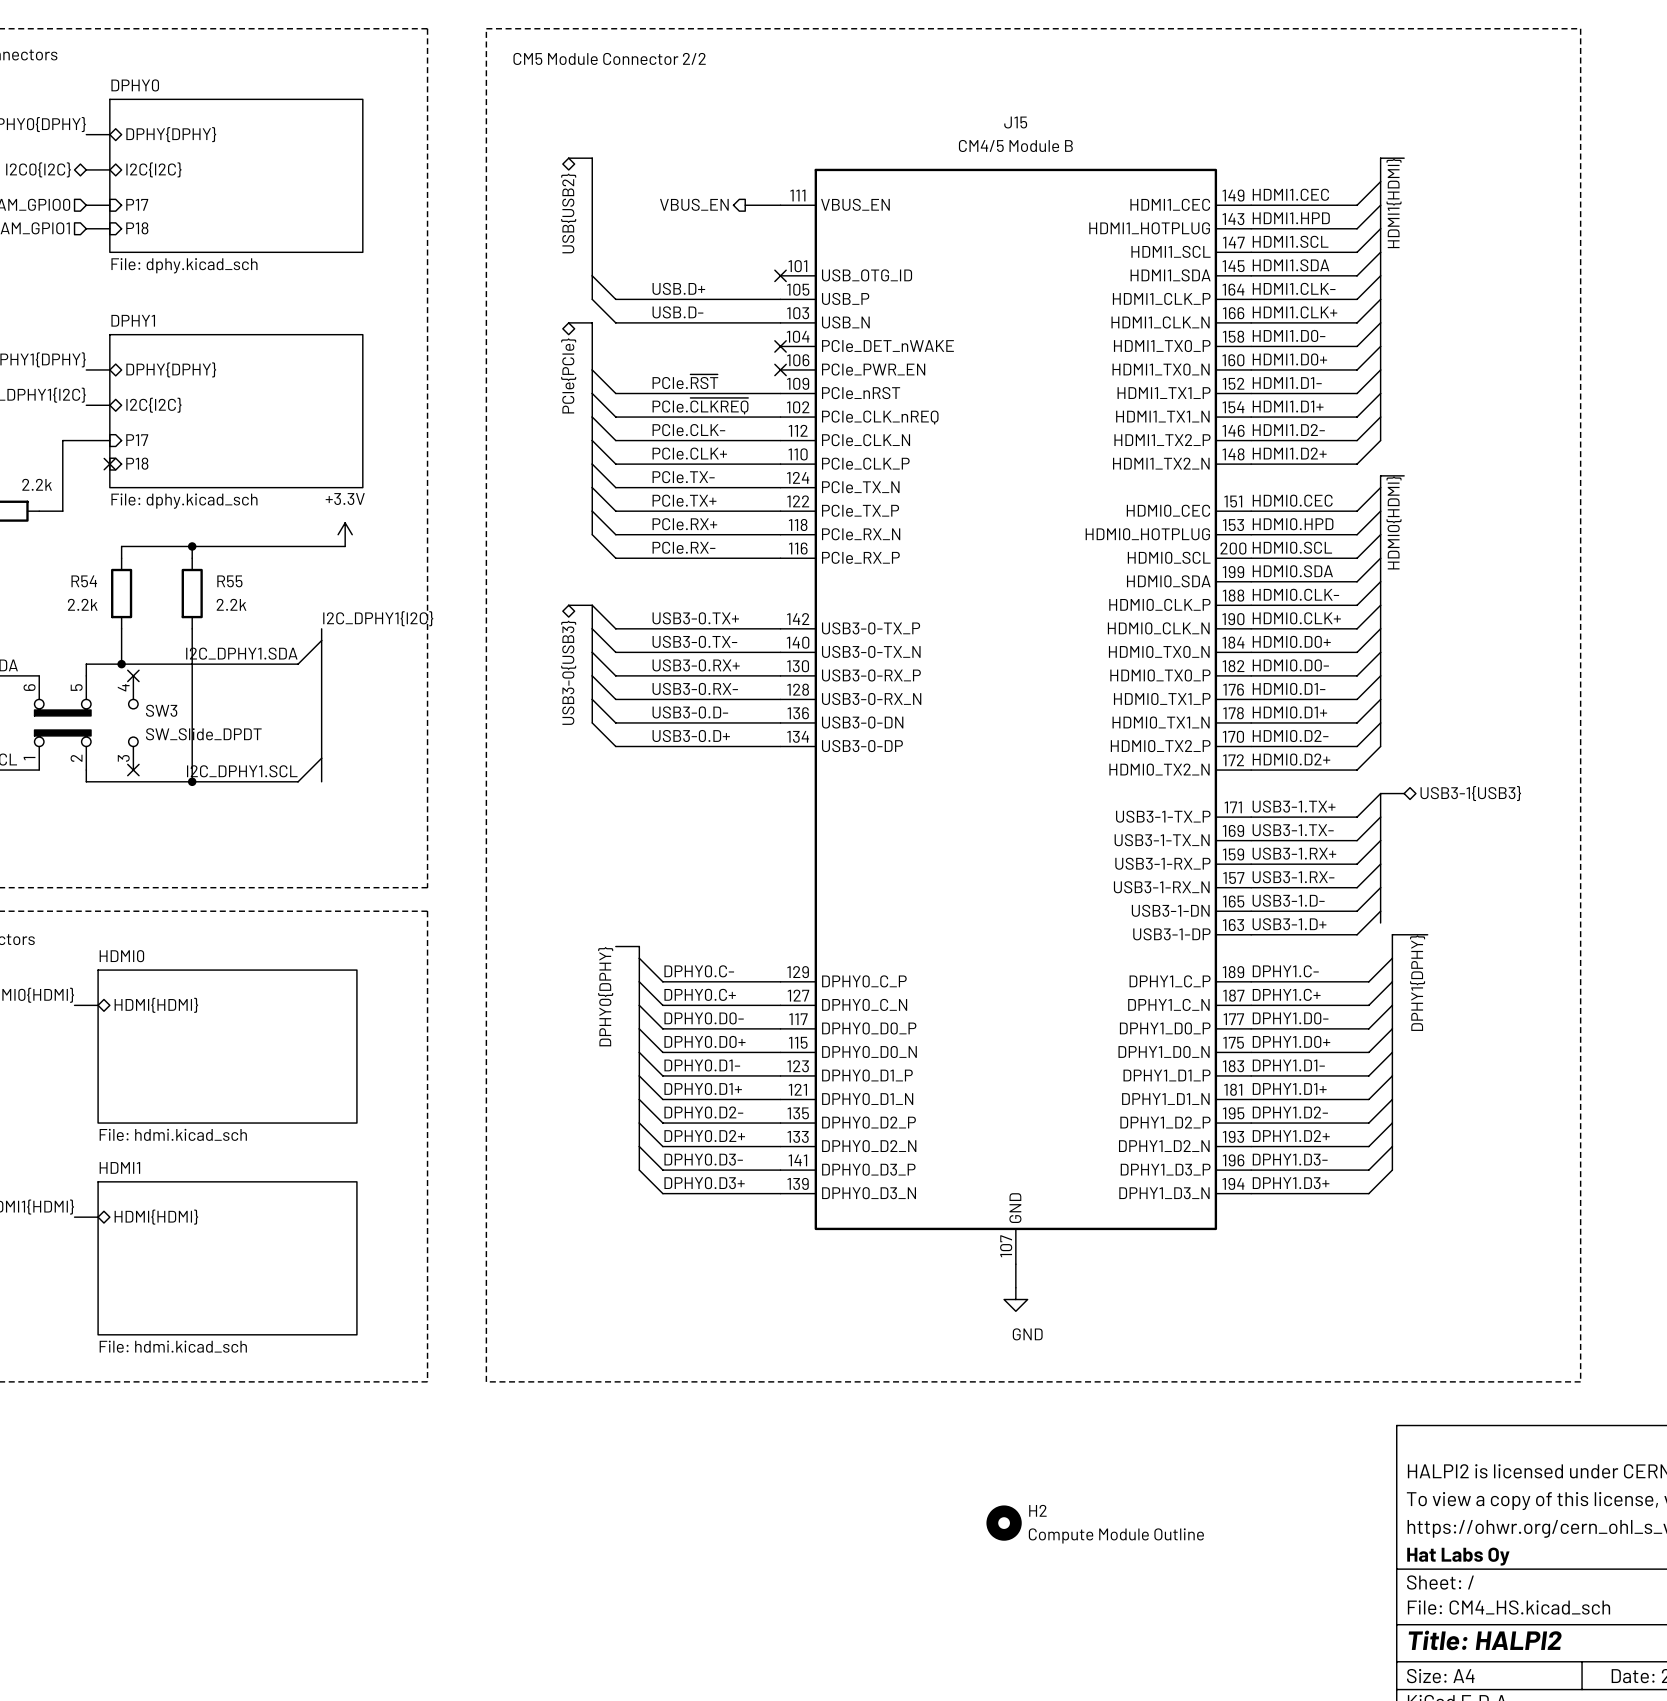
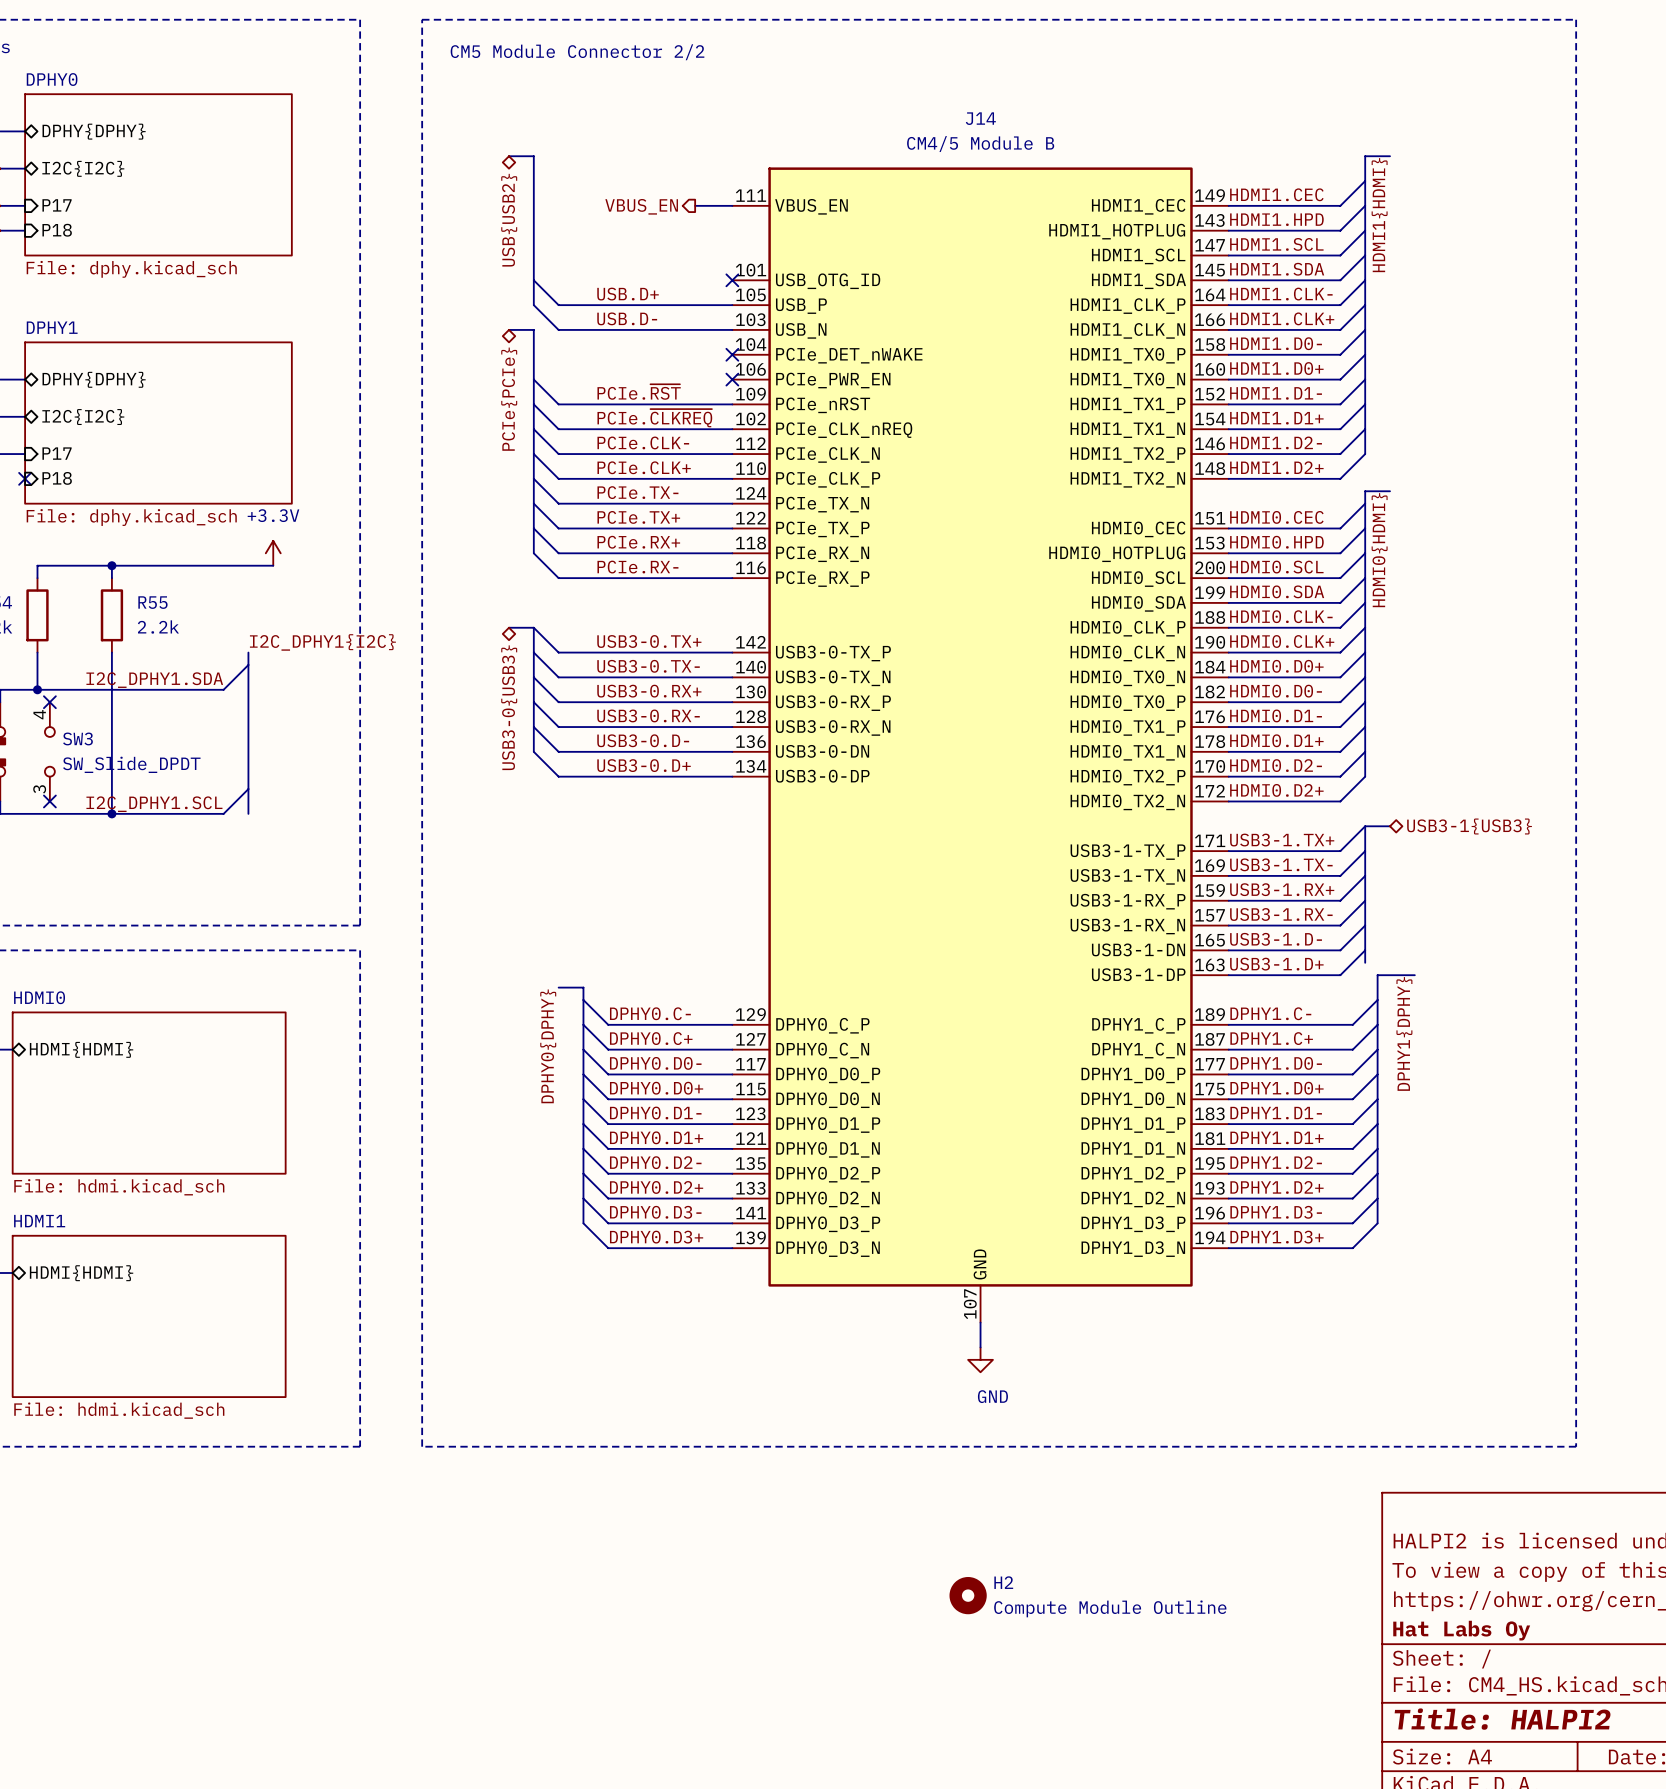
J15 name: J15 (1015, 122) -> J14 (980, 118)

